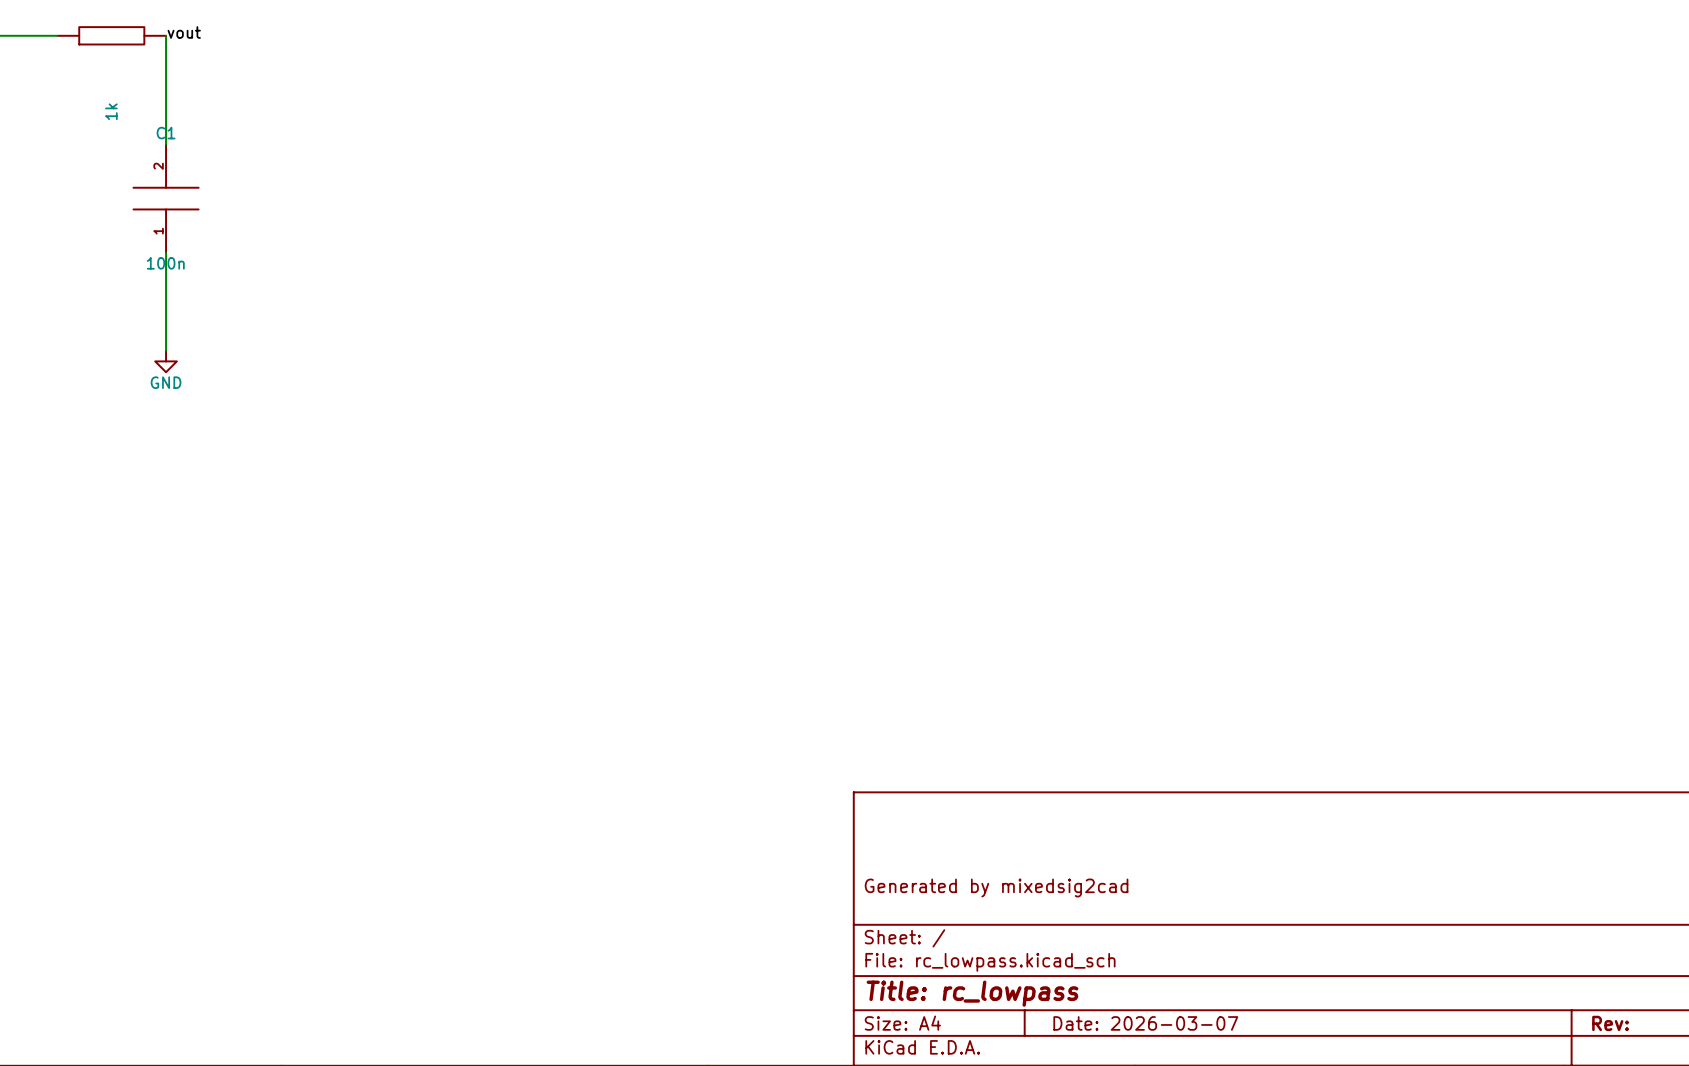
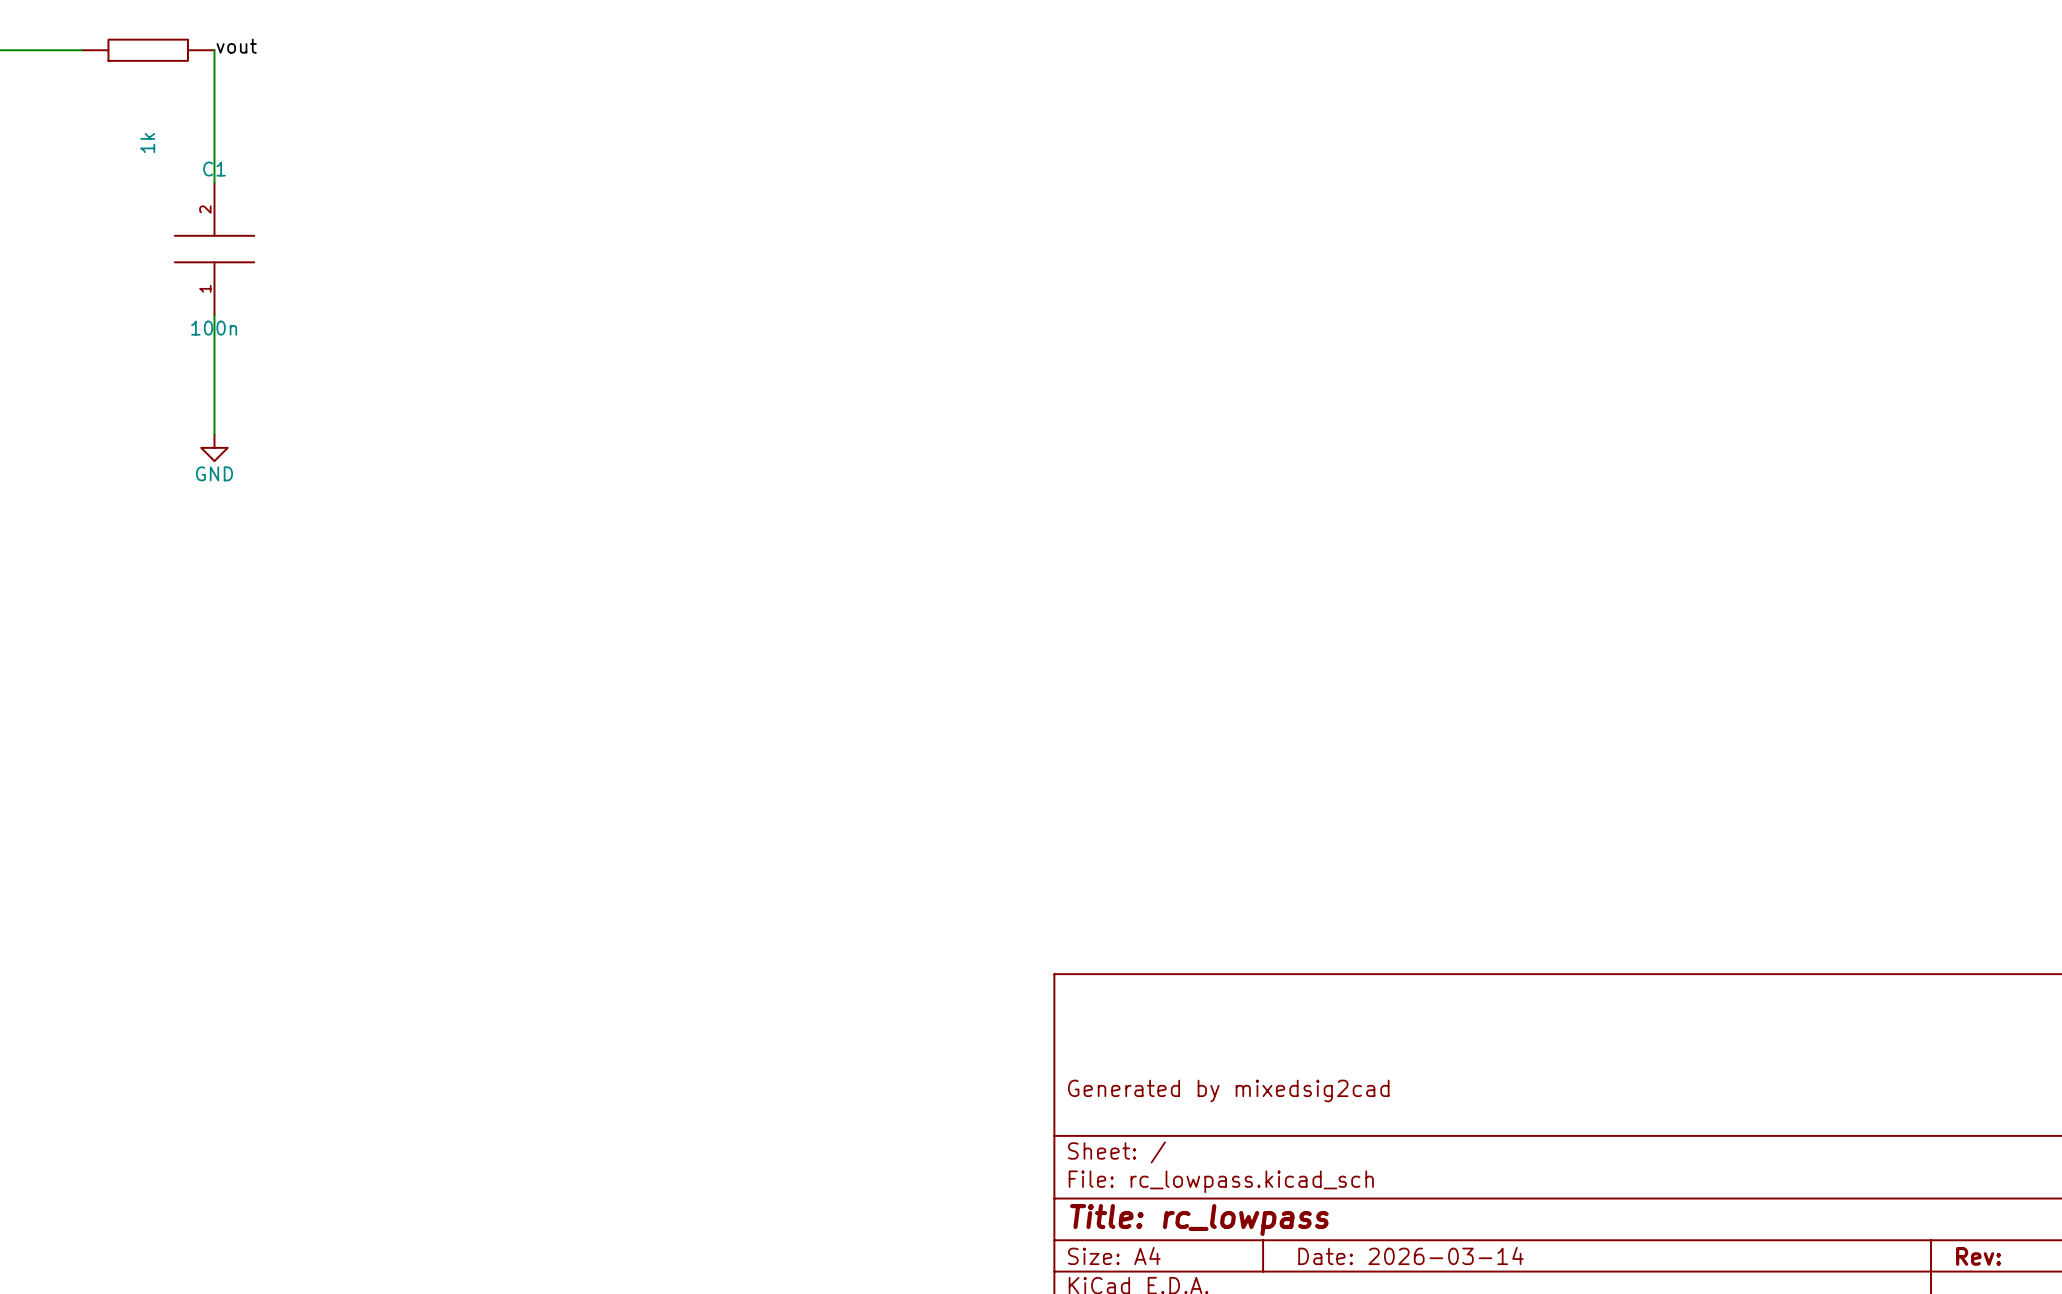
title block: Date: 2026-03-07 (1145, 1023) -> Date: 2026-03-14 (1410, 1256)

